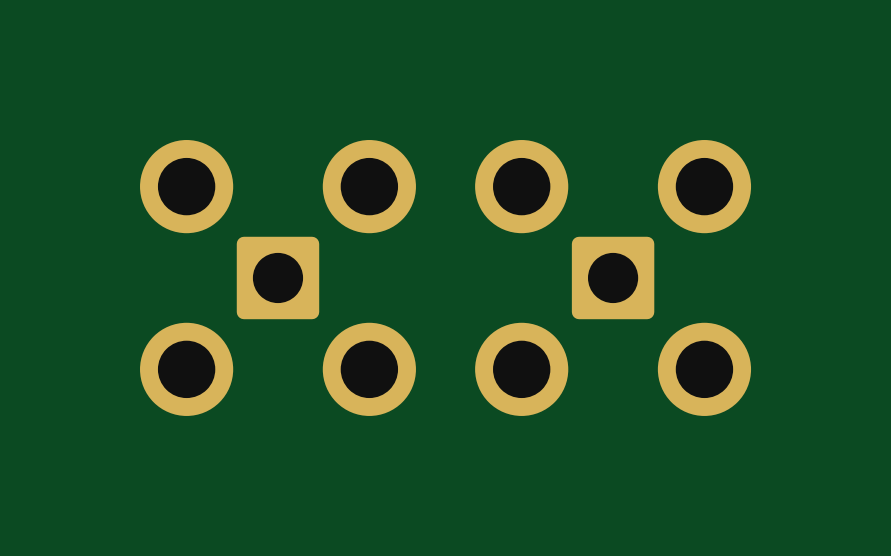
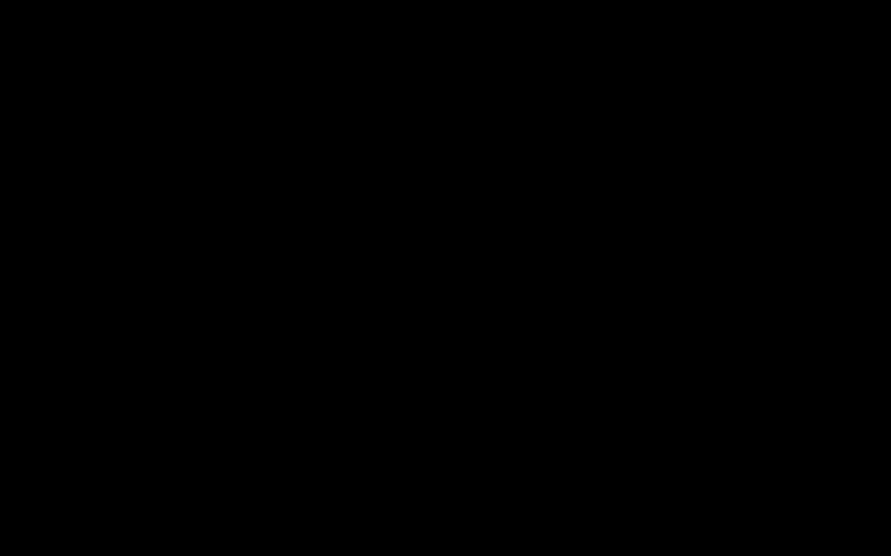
part: (277, 277) -> none
part: (613, 277) -> none

